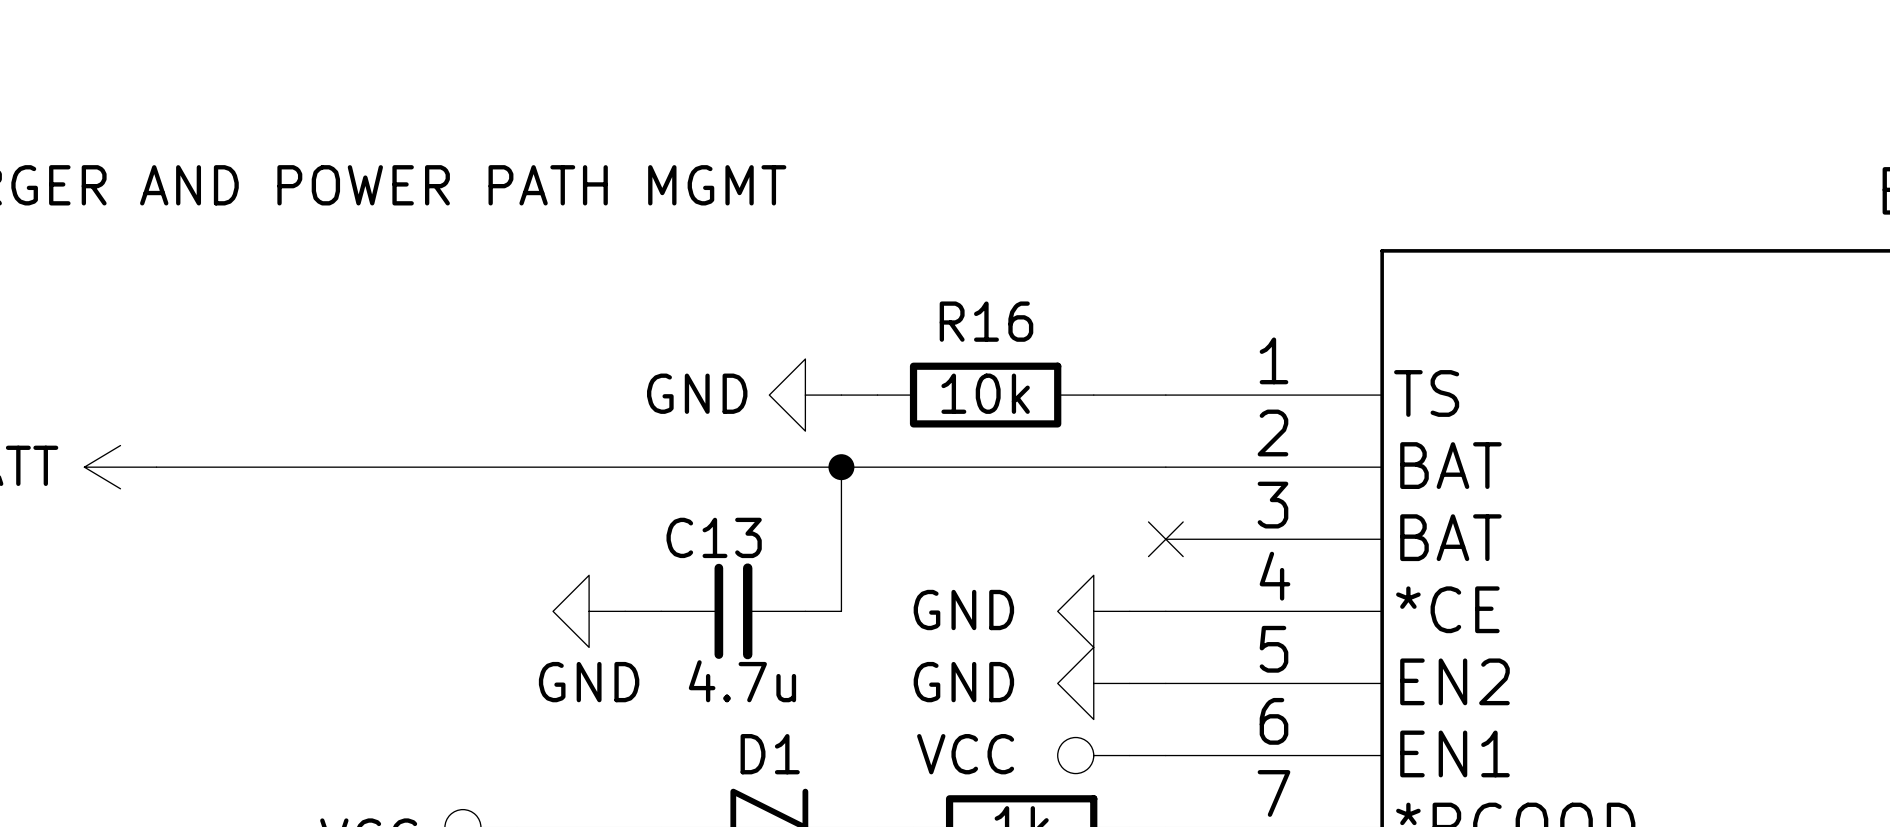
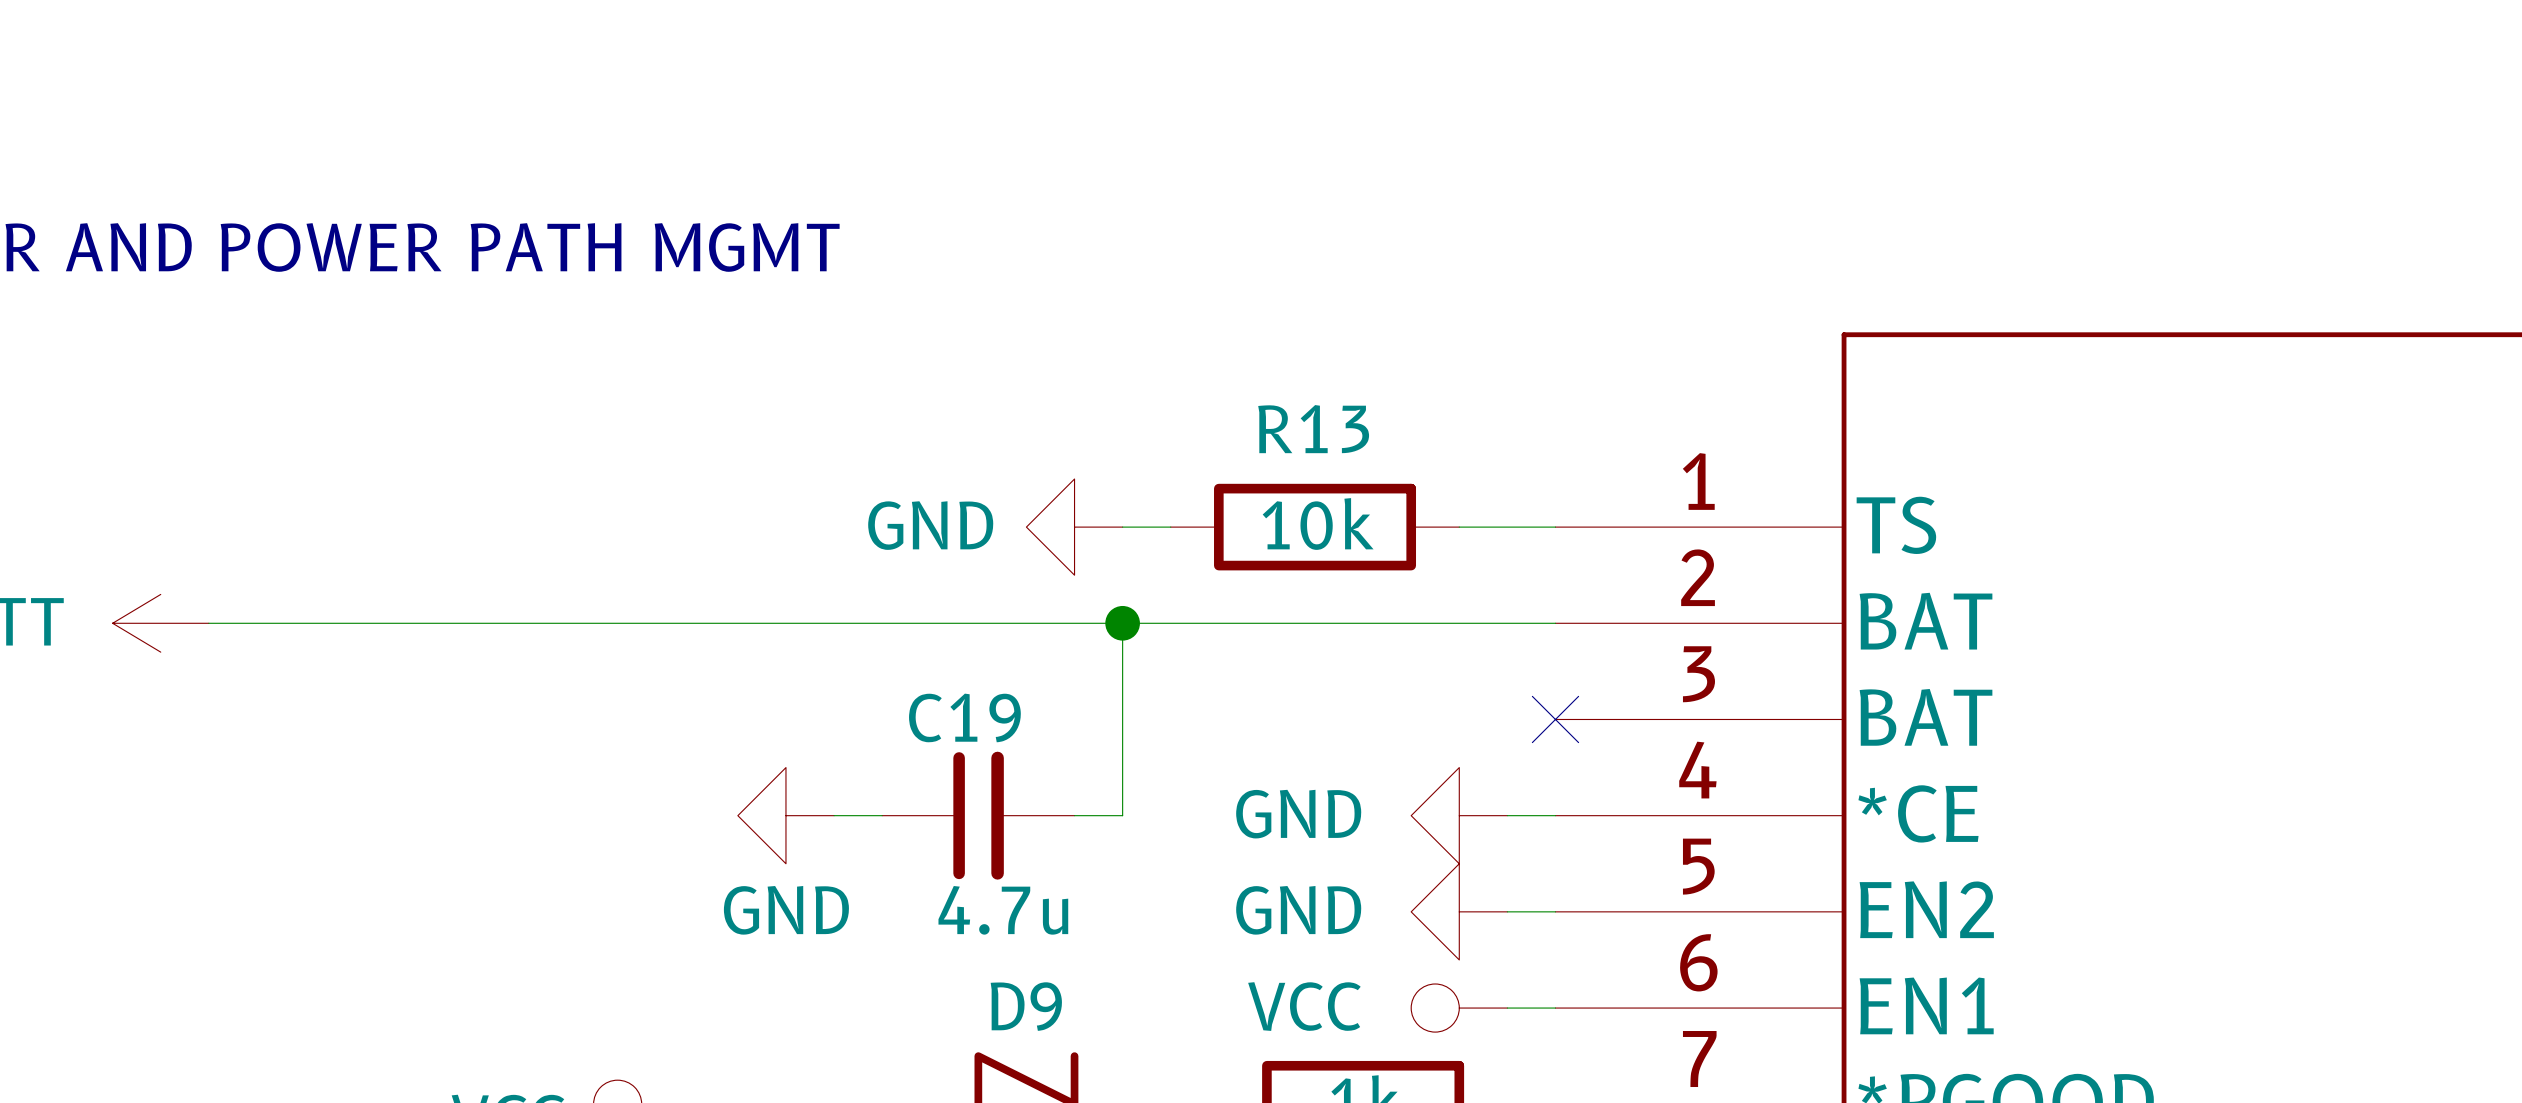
R16 name: R16 (986, 321) -> R13 (1313, 429)
C13 name: C13 (714, 537) -> C19 (964, 717)
D1 name: D1 (770, 754) -> D9 (1026, 1006)

